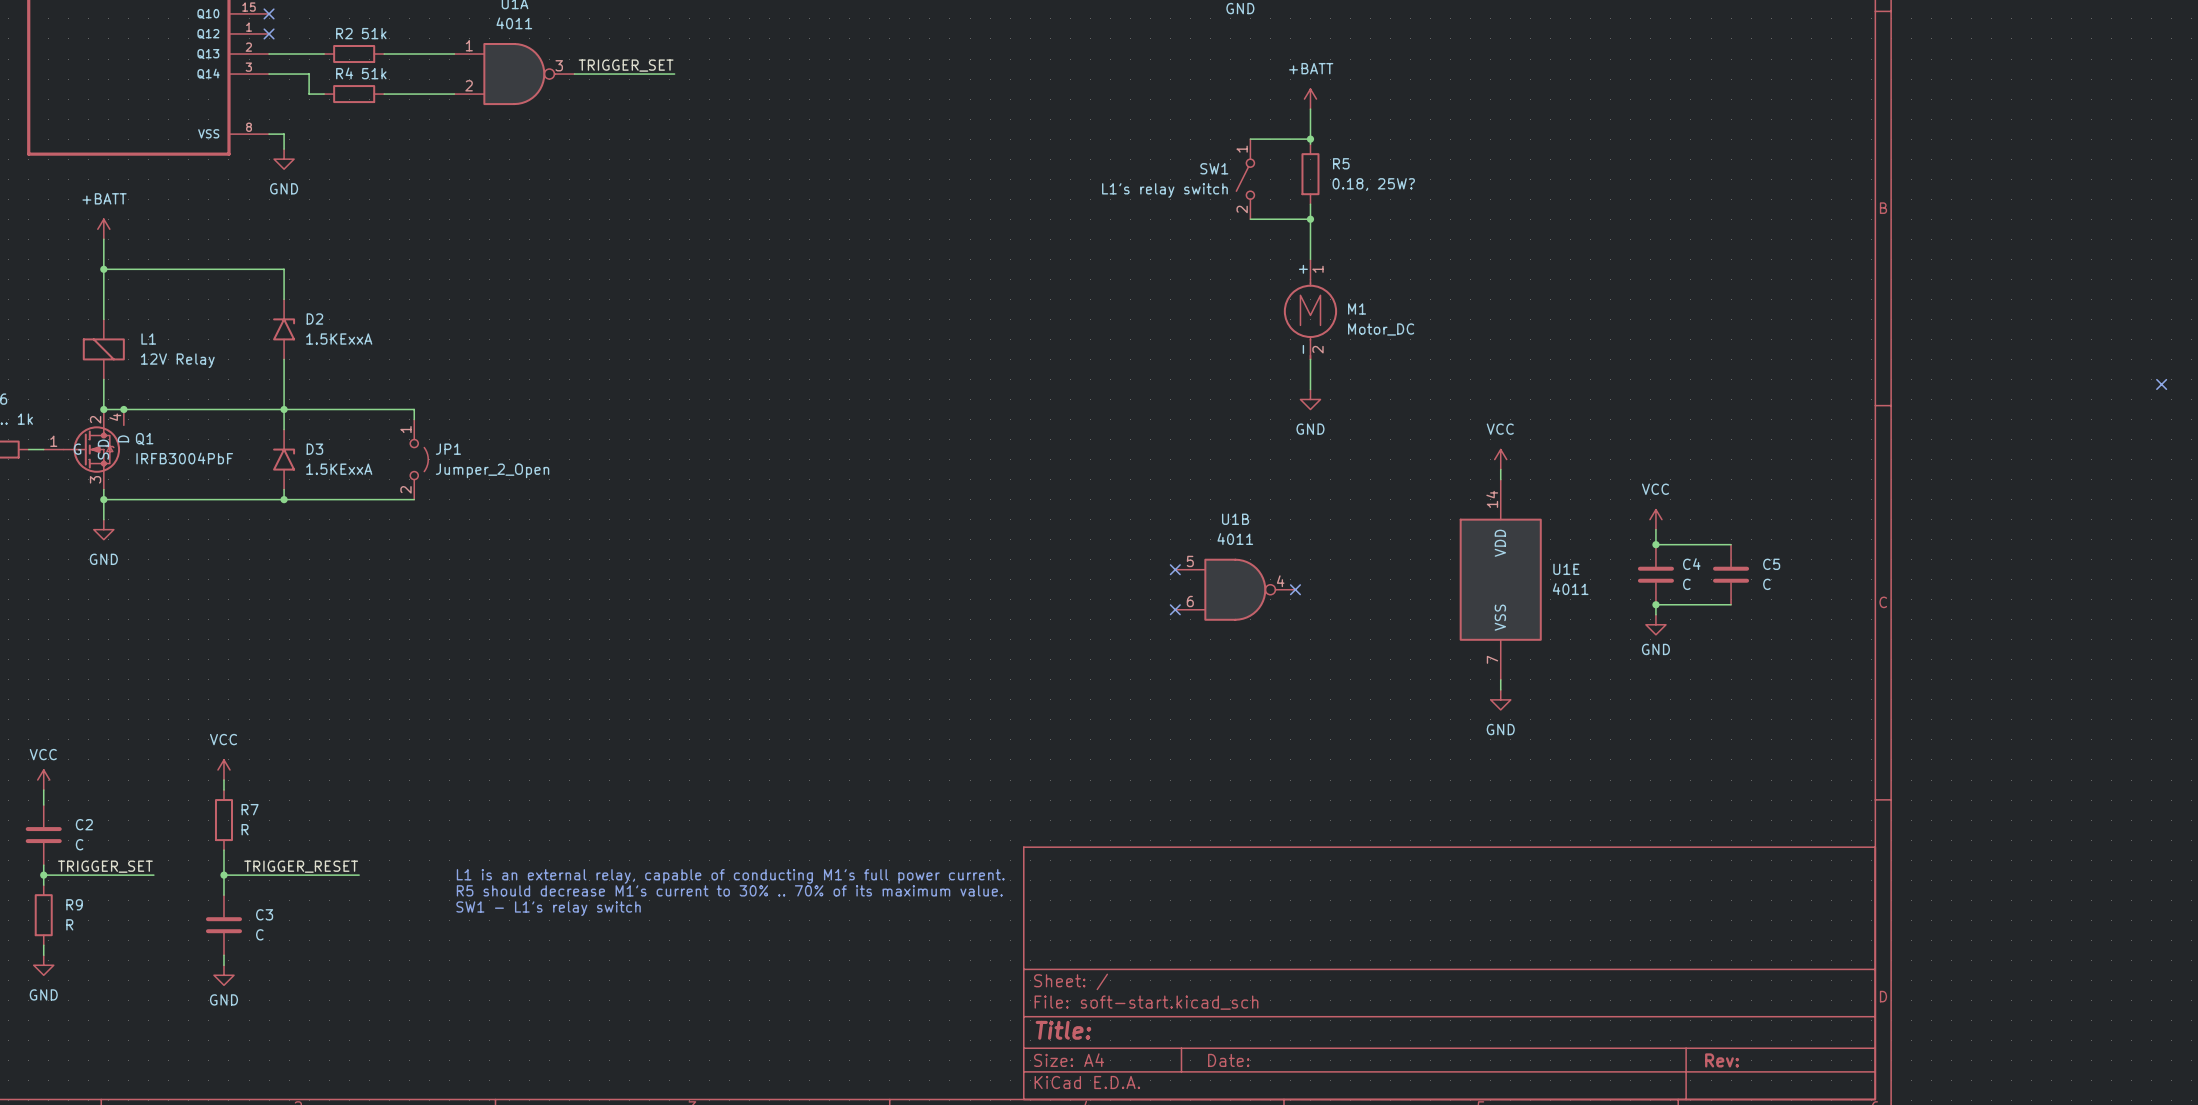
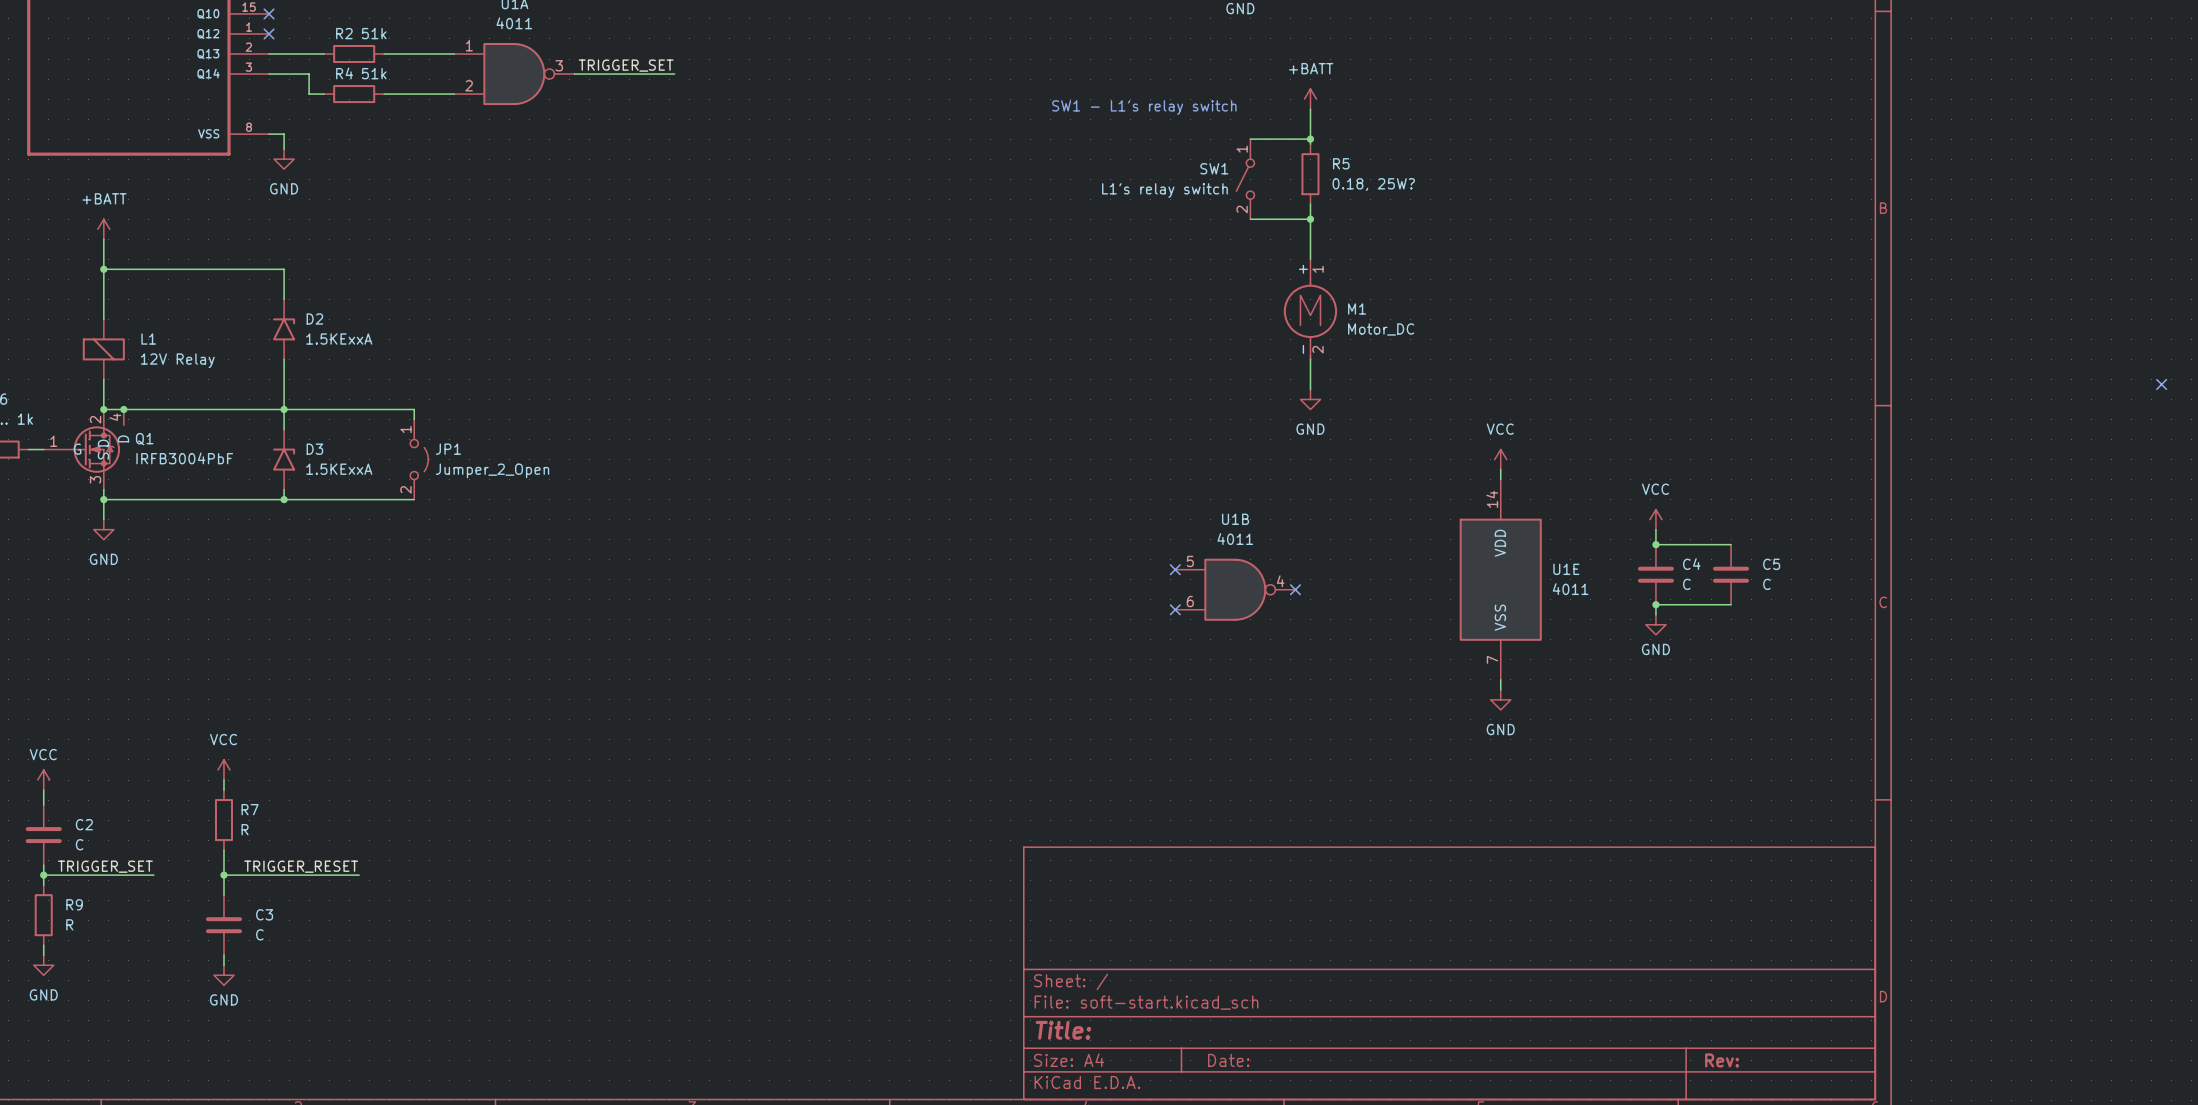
text: none -> SW1 - L1's relay switch (1144, 107)
text: L1 is an external relay, capable of conducting M1's full power current. (730, 876) -> none
text: R5 should decrease M1's current to 30% .. 70% of its maximum value. (729, 890) -> none
text: SW1 - L1's relay switch (548, 908) -> none

